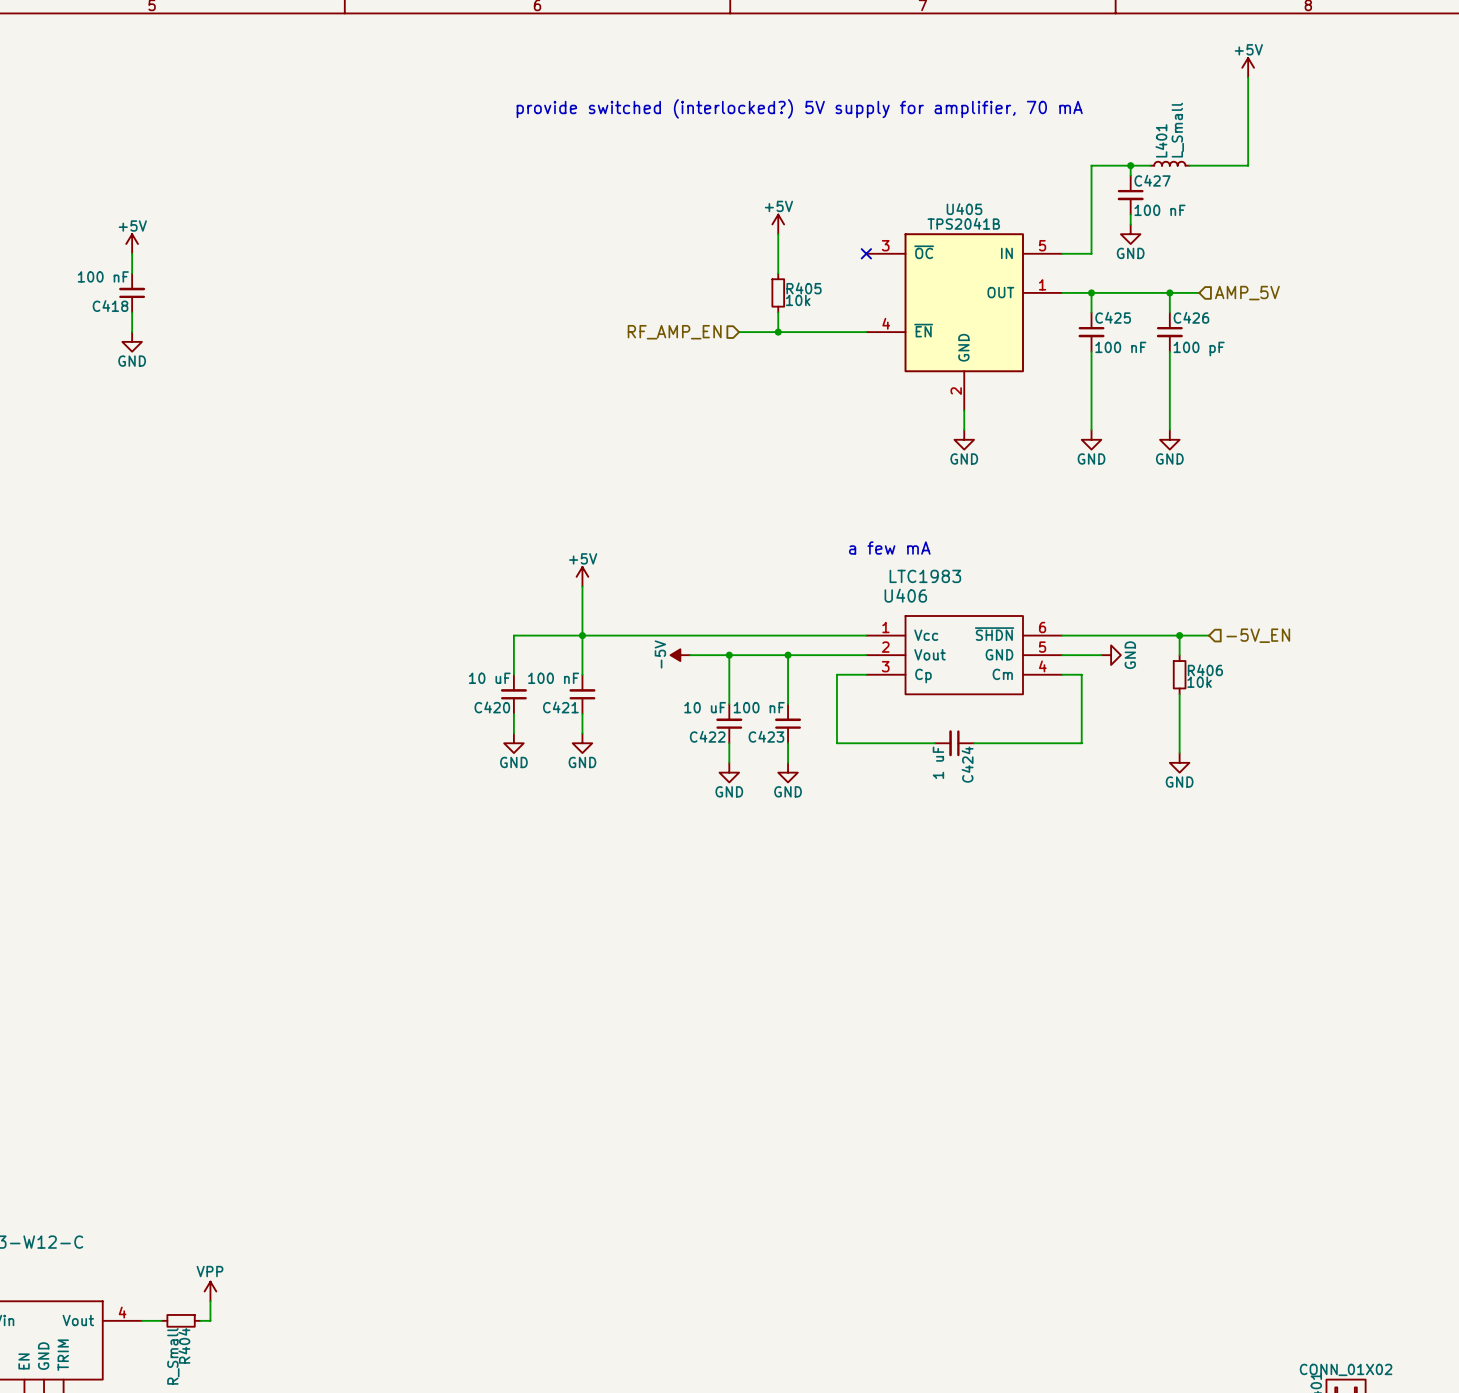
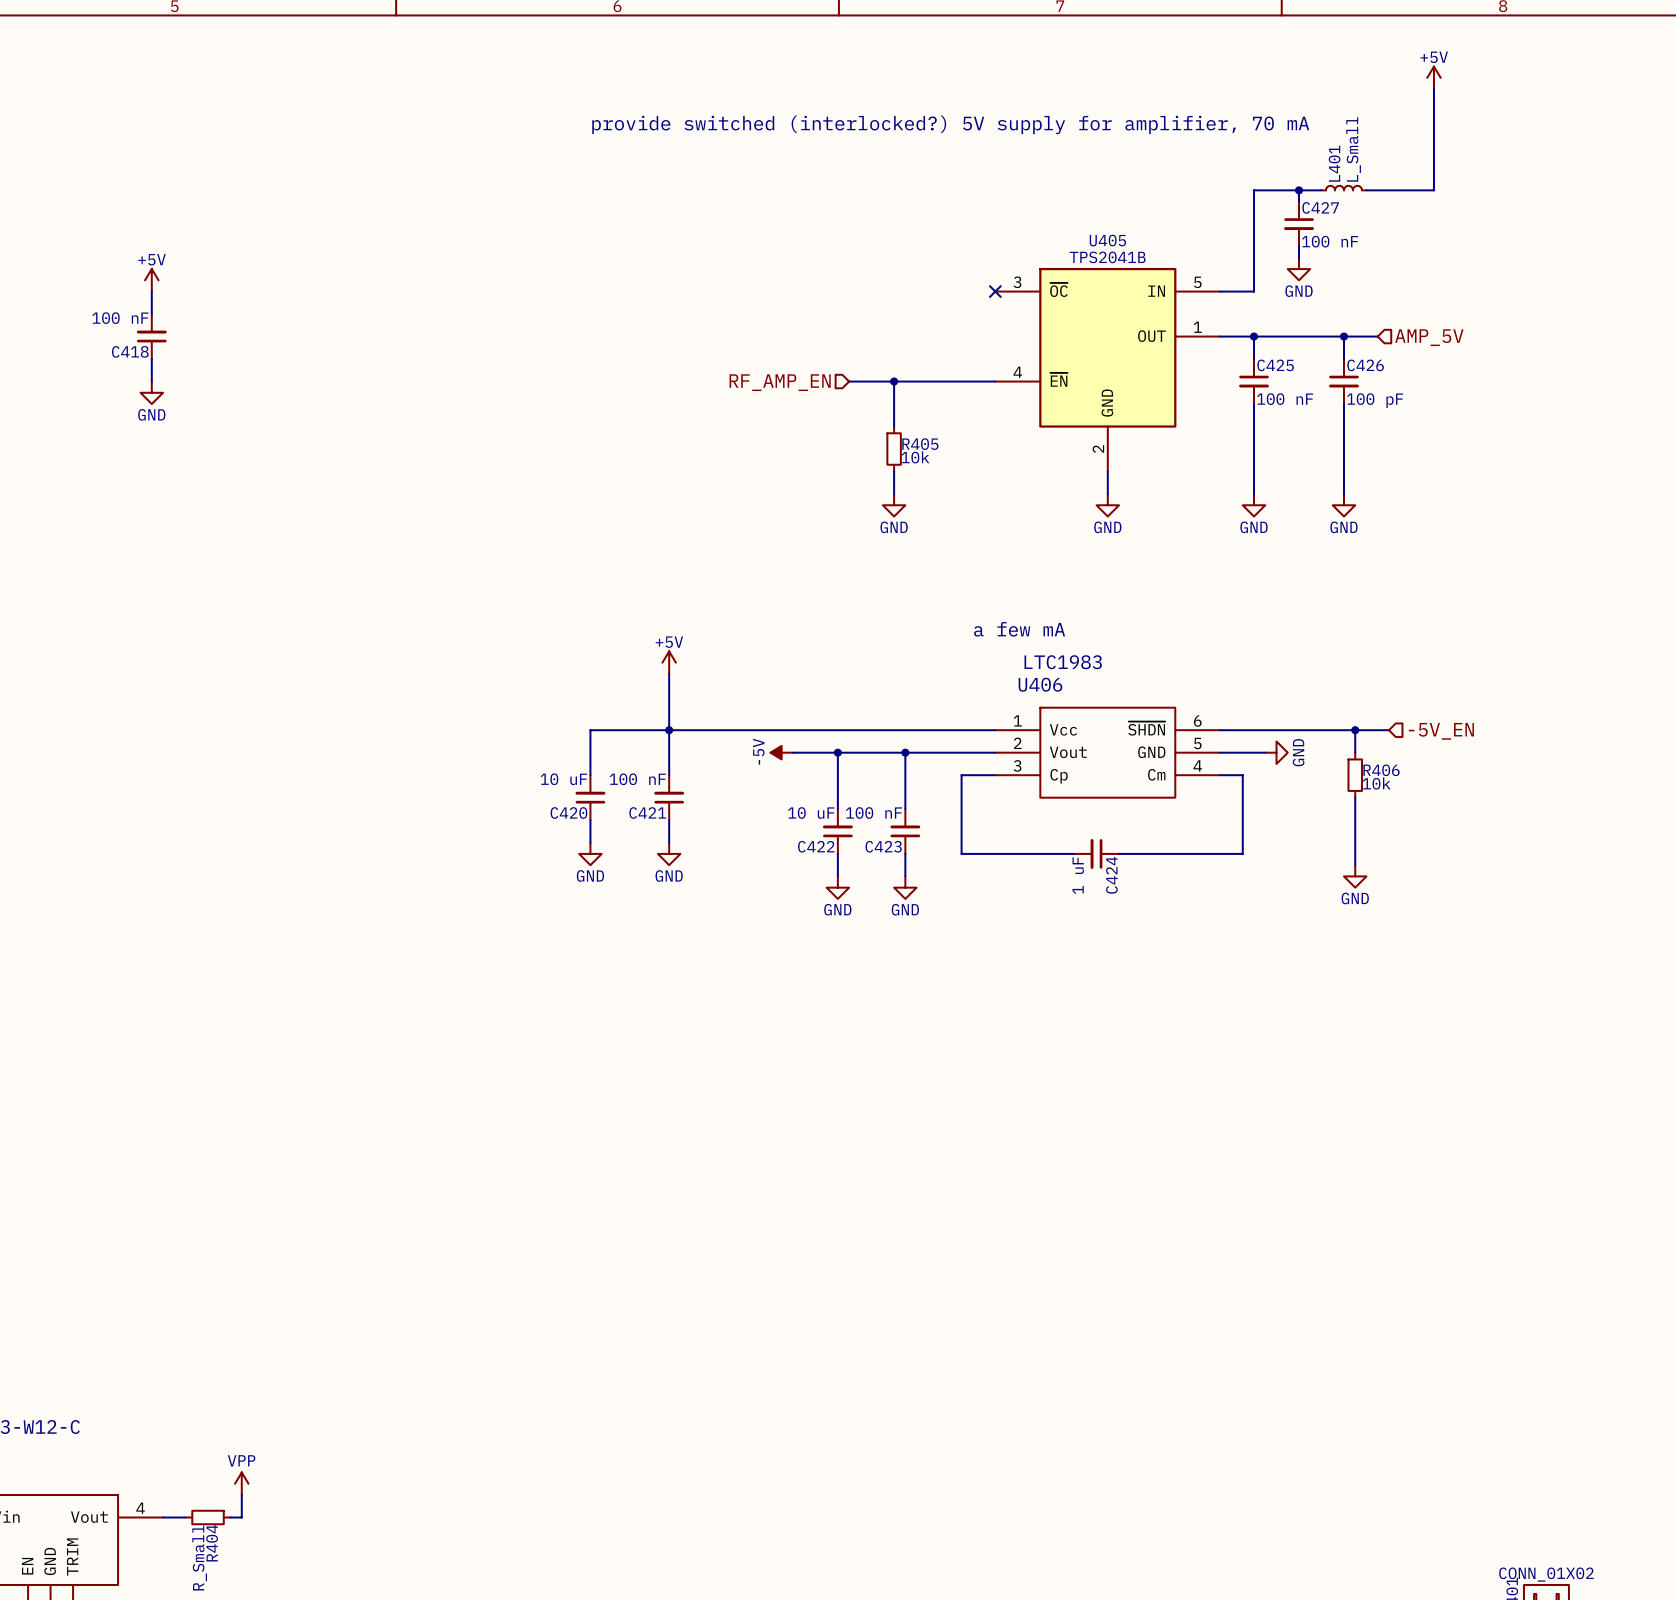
power symbol: +5V (778, 224) -> none
wire: (778, 234) (778, 273) -> none
R405 position: (778, 292) -> (894, 449)
wire: (778, 312) (778, 332) -> (894, 426) (894, 381)
wire: none -> (894, 471) (894, 494)
power symbol: none -> GND (894, 505)

